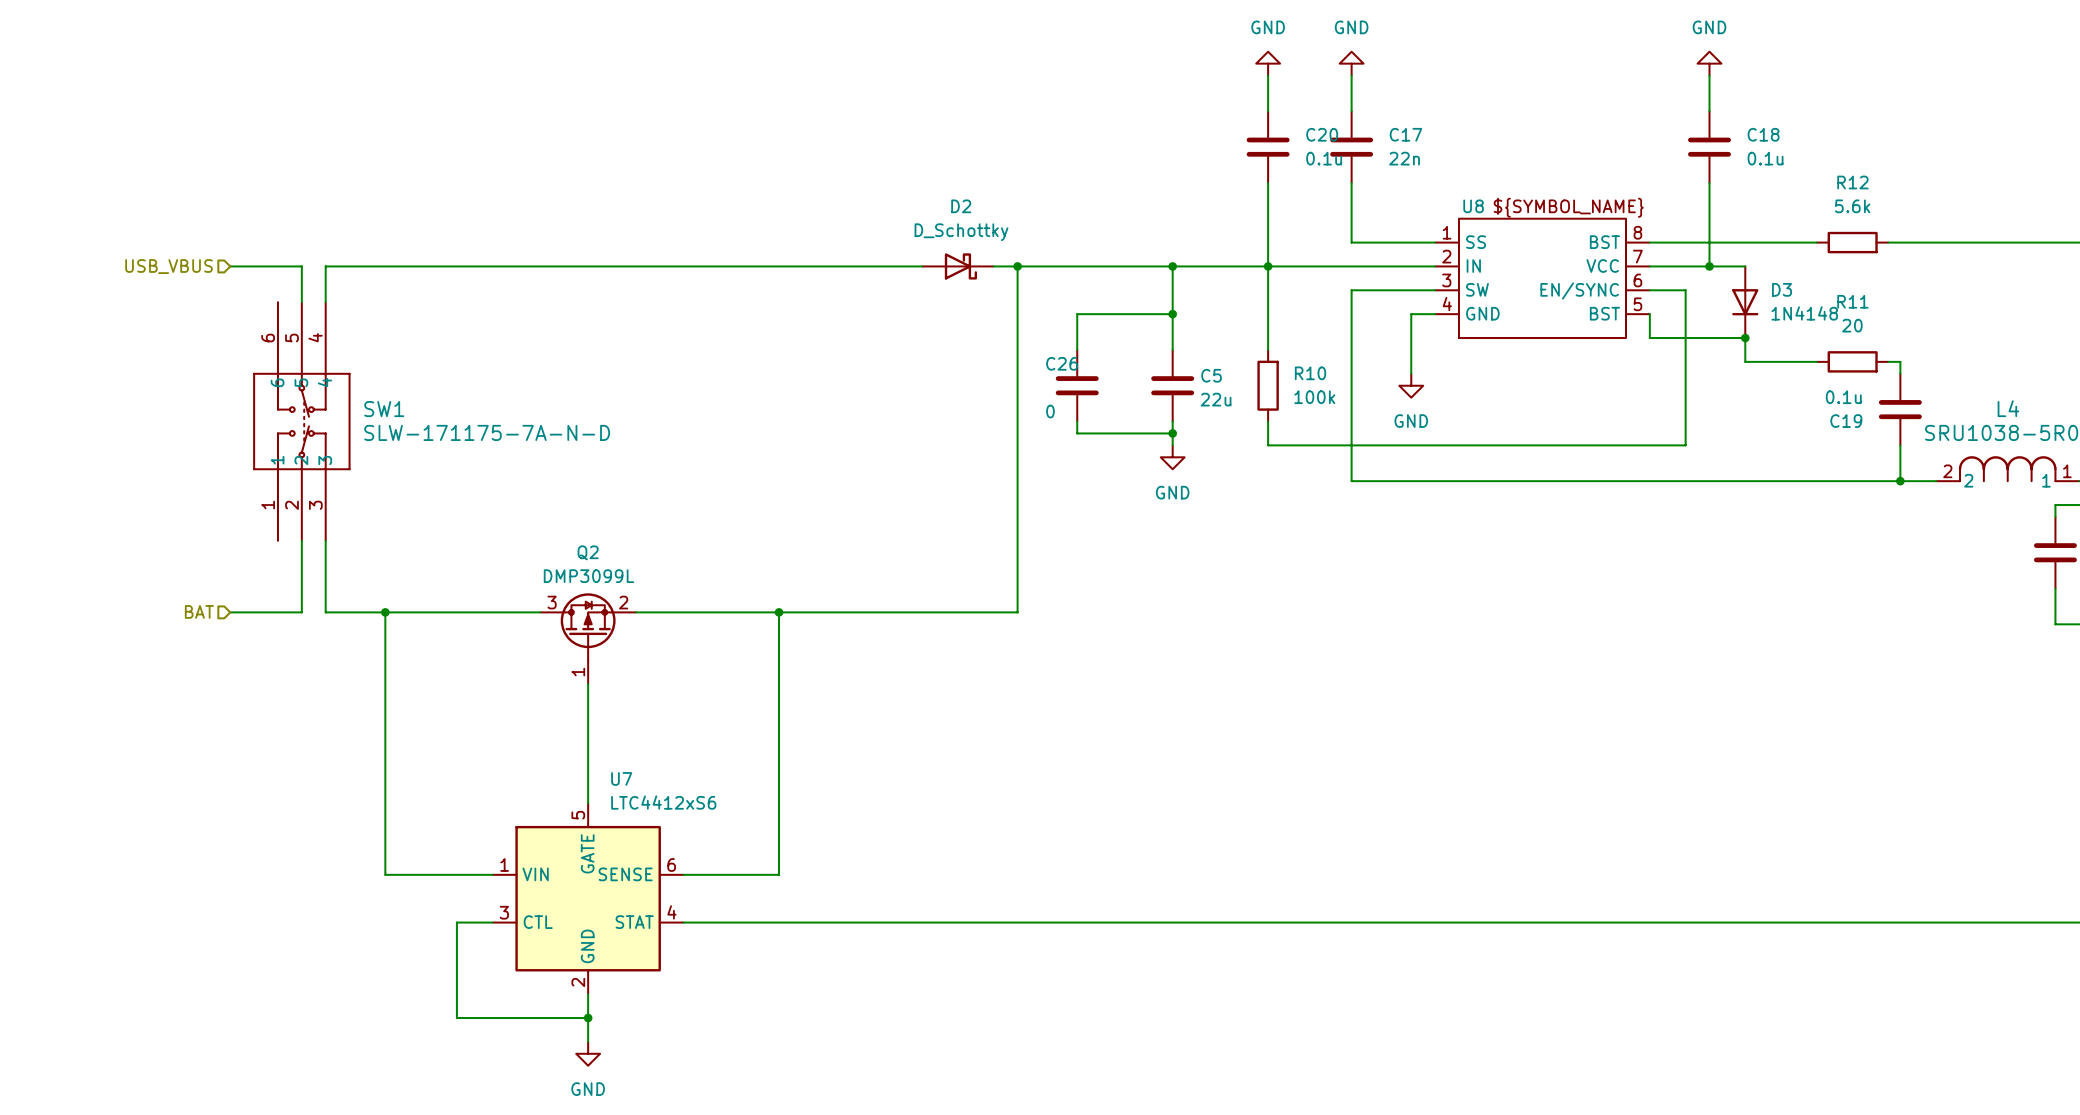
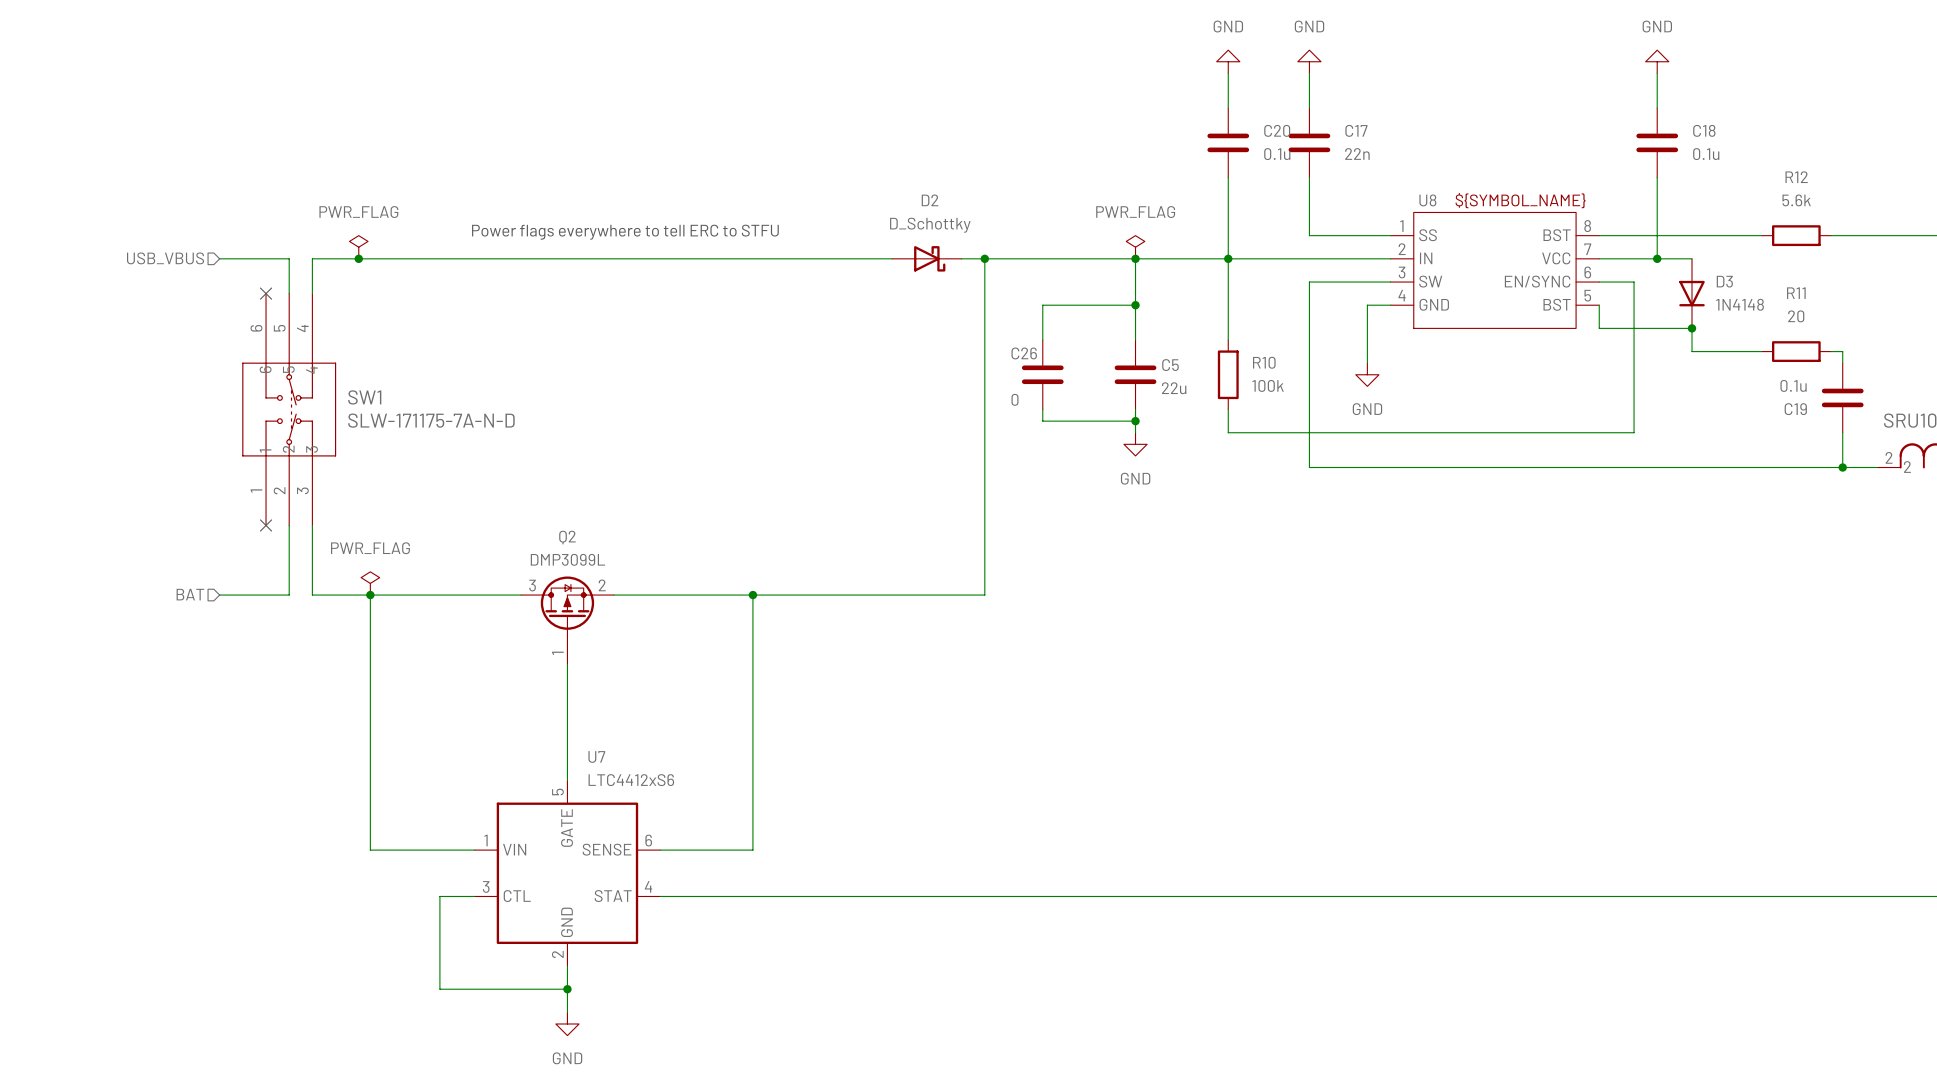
text: none -> Power flags everywhere to tell ERC to STFU (625, 232)
power symbol: none -> PWR_FLAG (358, 247)
power symbol: none -> PWR_FLAG (1135, 247)
junction: none -> (358, 258)
no-connect mark: none -> (266, 293)
no-connect mark: none -> (266, 525)
power symbol: none -> PWR_FLAG (370, 583)

